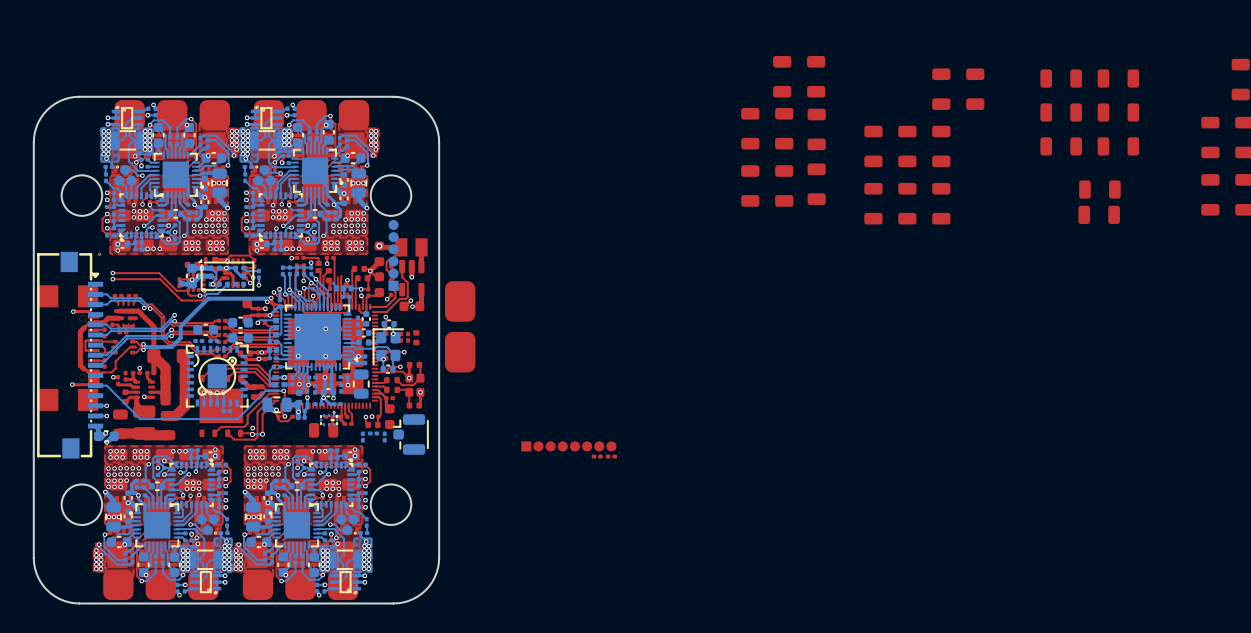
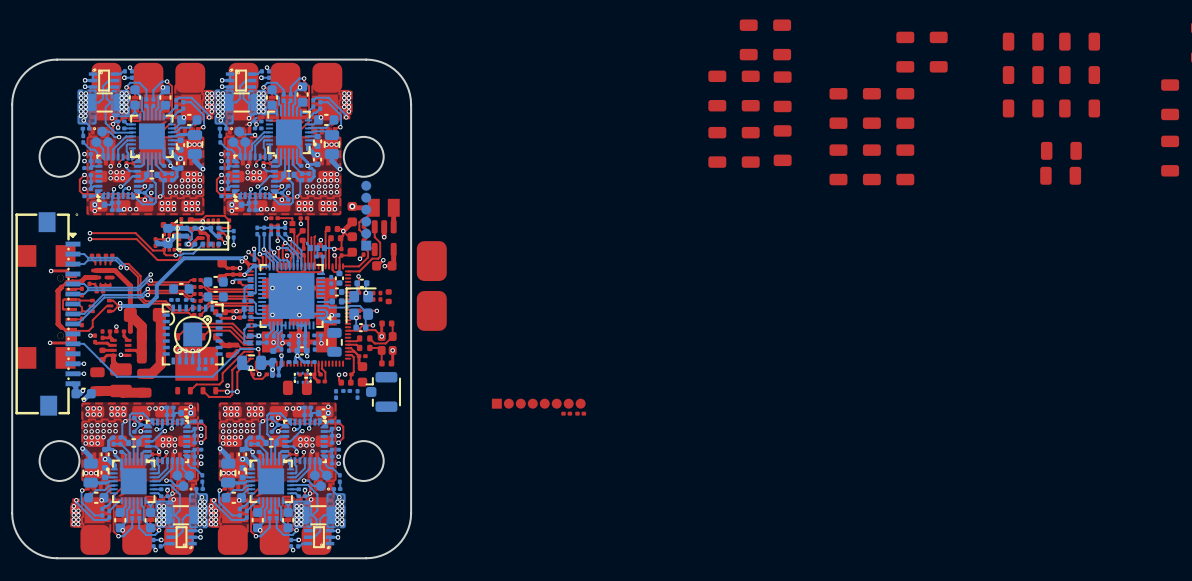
bottom track: (272, 140) (268, 144) (268, 162) (273, 167) (295, 166) -> none
via: none -> (258, 111)
via: none -> (263, 111)
part: (285, 155) -> none
part: none -> (258, 121)
part: (285, 162) -> none
part: none -> (258, 128)

